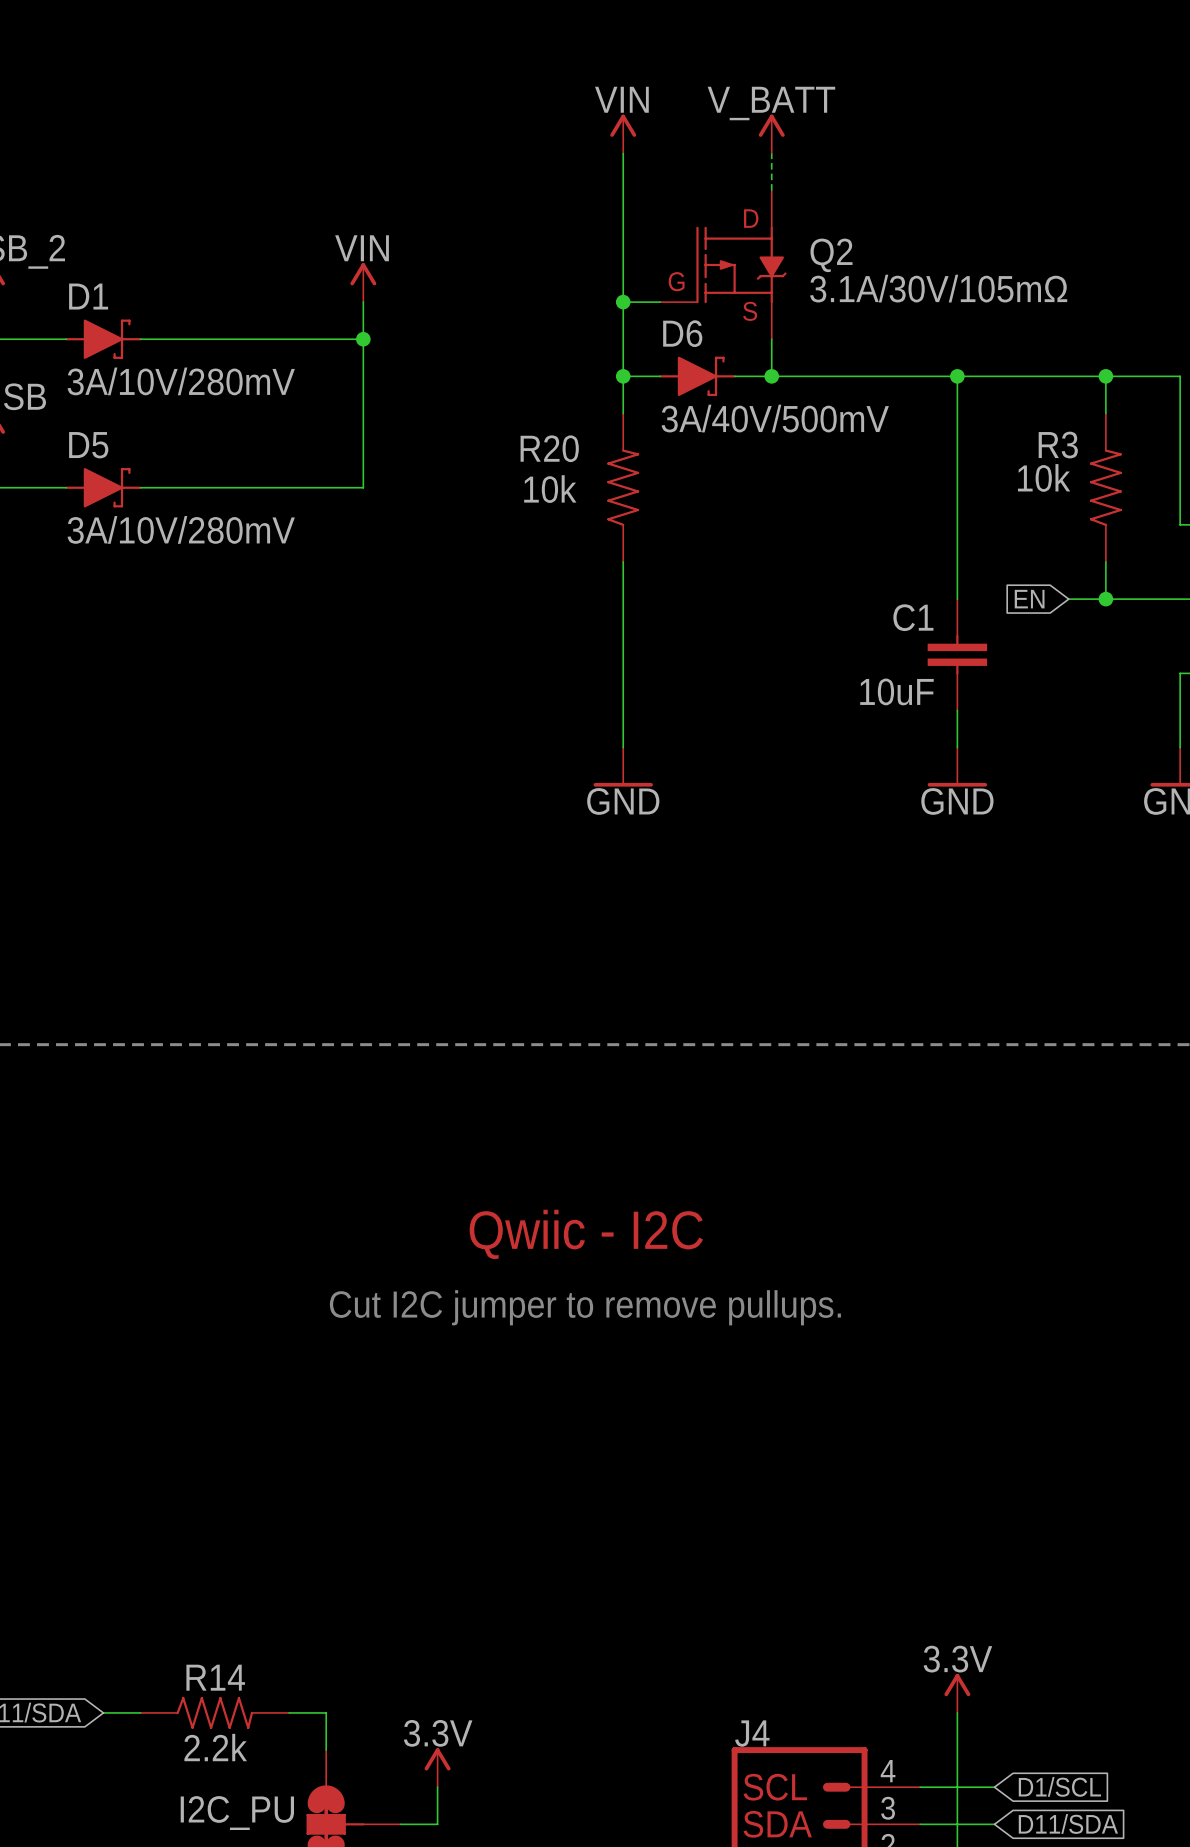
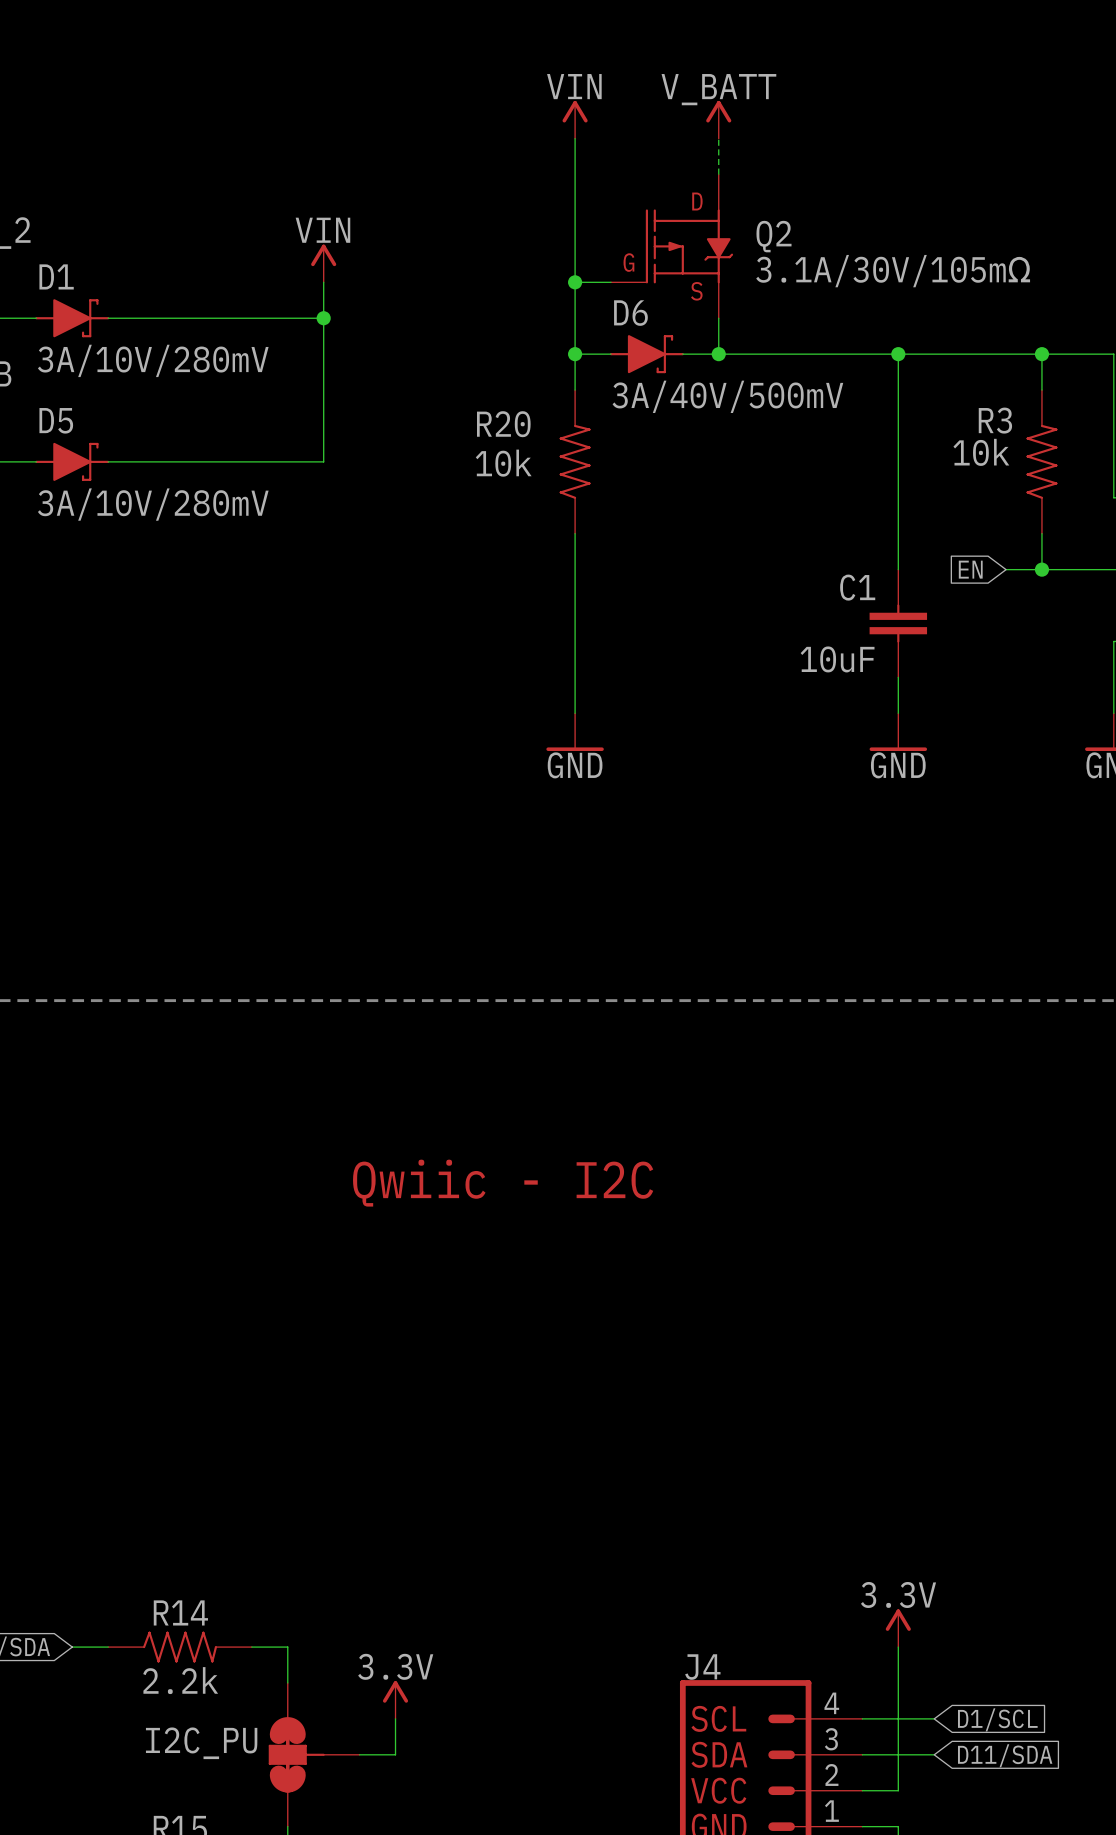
text position: Qwiic - I2C (586, 1234) -> Qwiic - I2C (503, 1183)
text: Cut I2C jumper to remove pullups. (585, 1307) -> none

